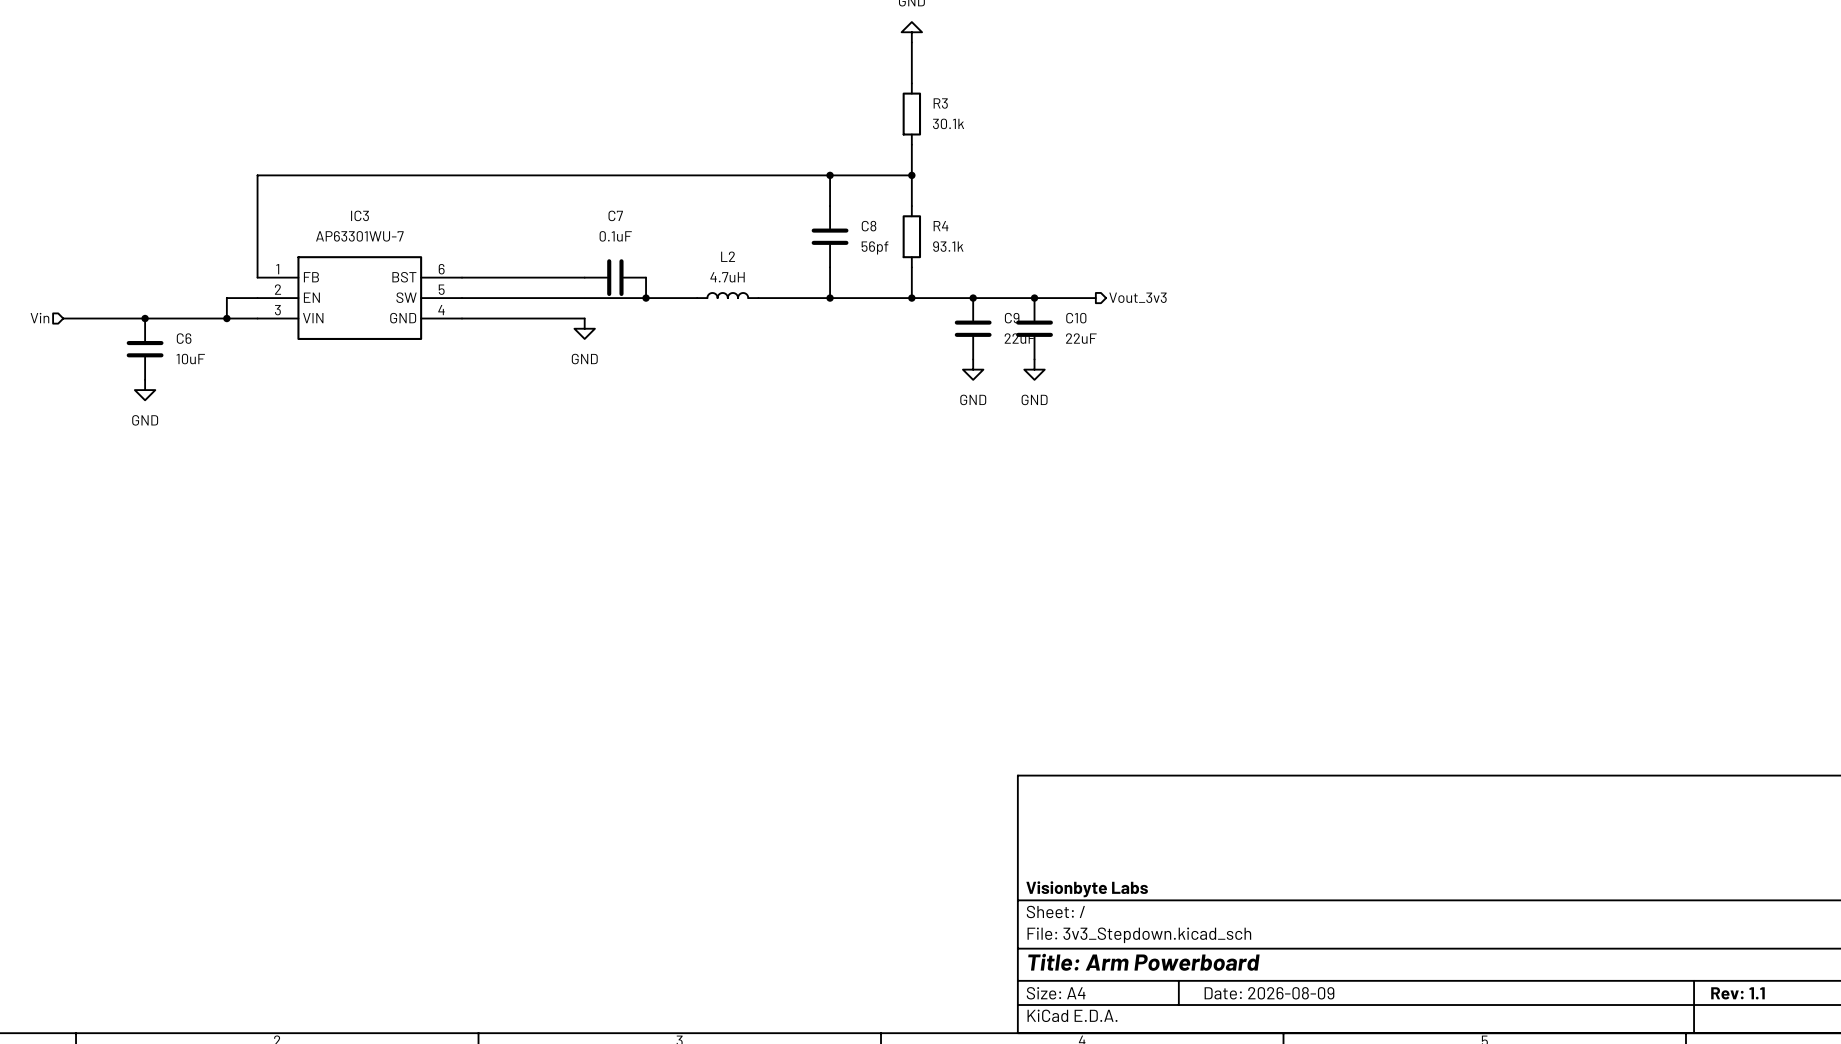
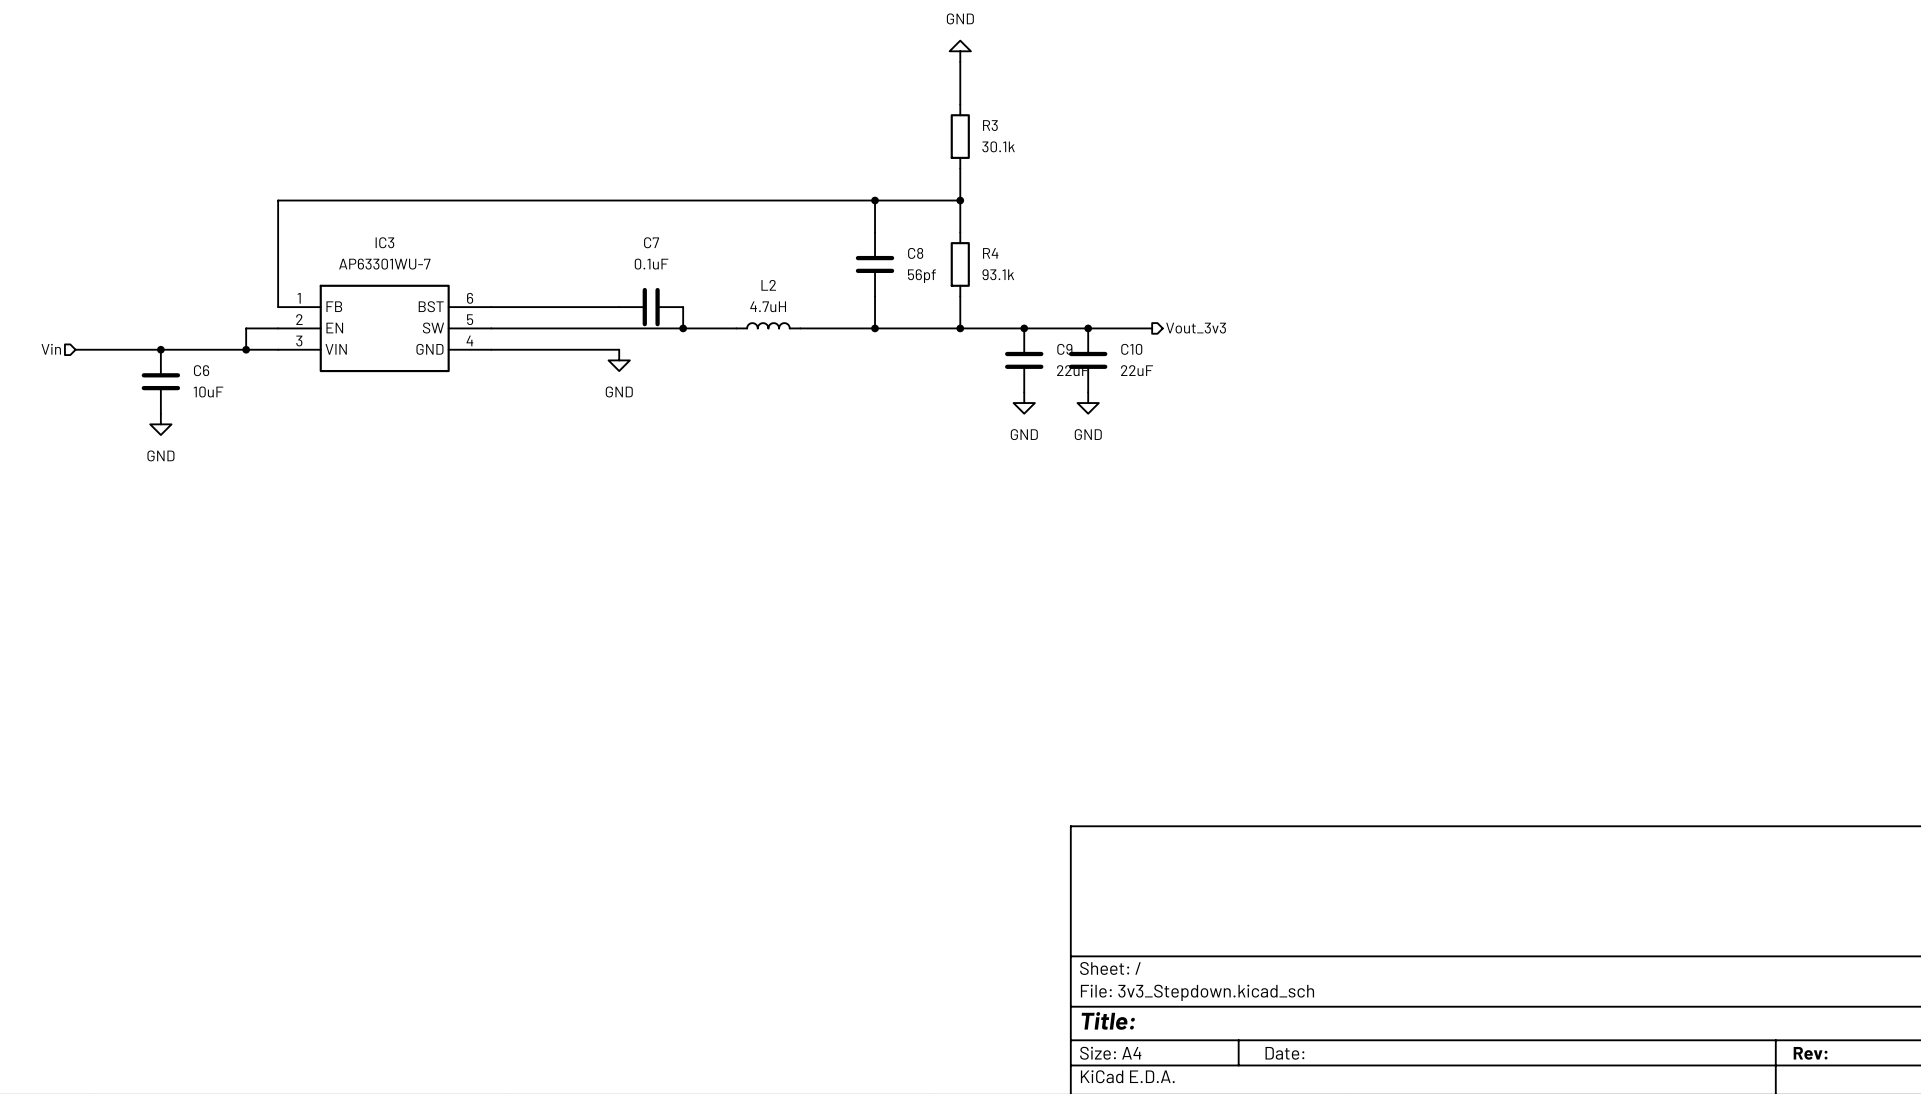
title block: Visionbyte Labs (1087, 889) -> none
title block: Title: Arm Powerboard (1143, 962) -> Title: (1108, 1020)
title block: Date: 2026-08-09 (1269, 993) -> Date: (1284, 1053)
title block: Rev: 1.1 (1737, 993) -> Rev: (1810, 1053)

